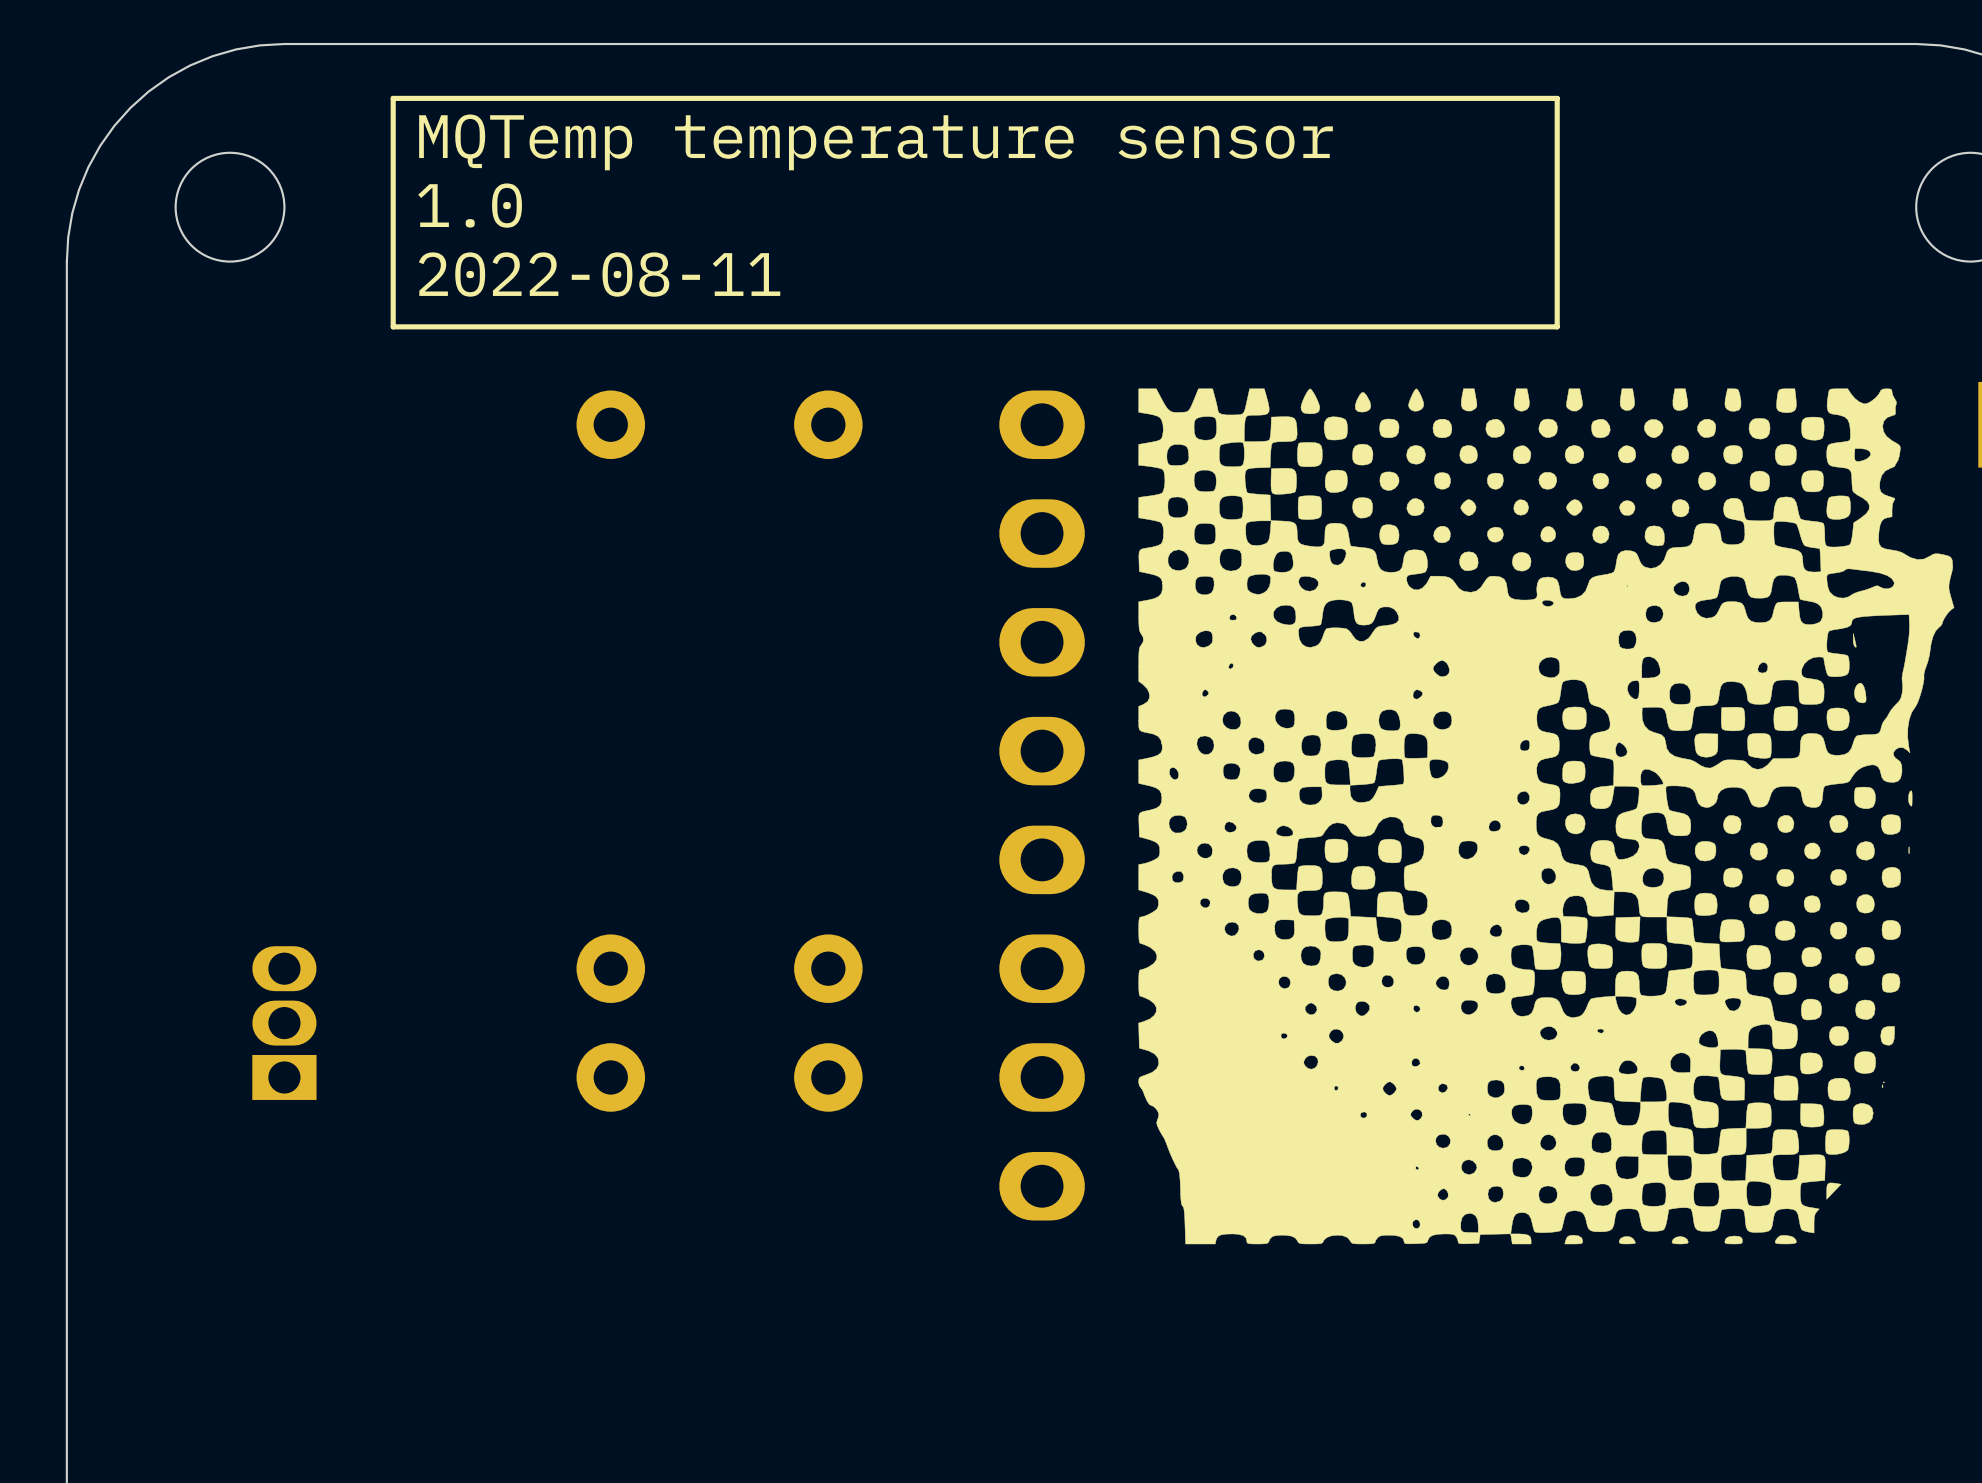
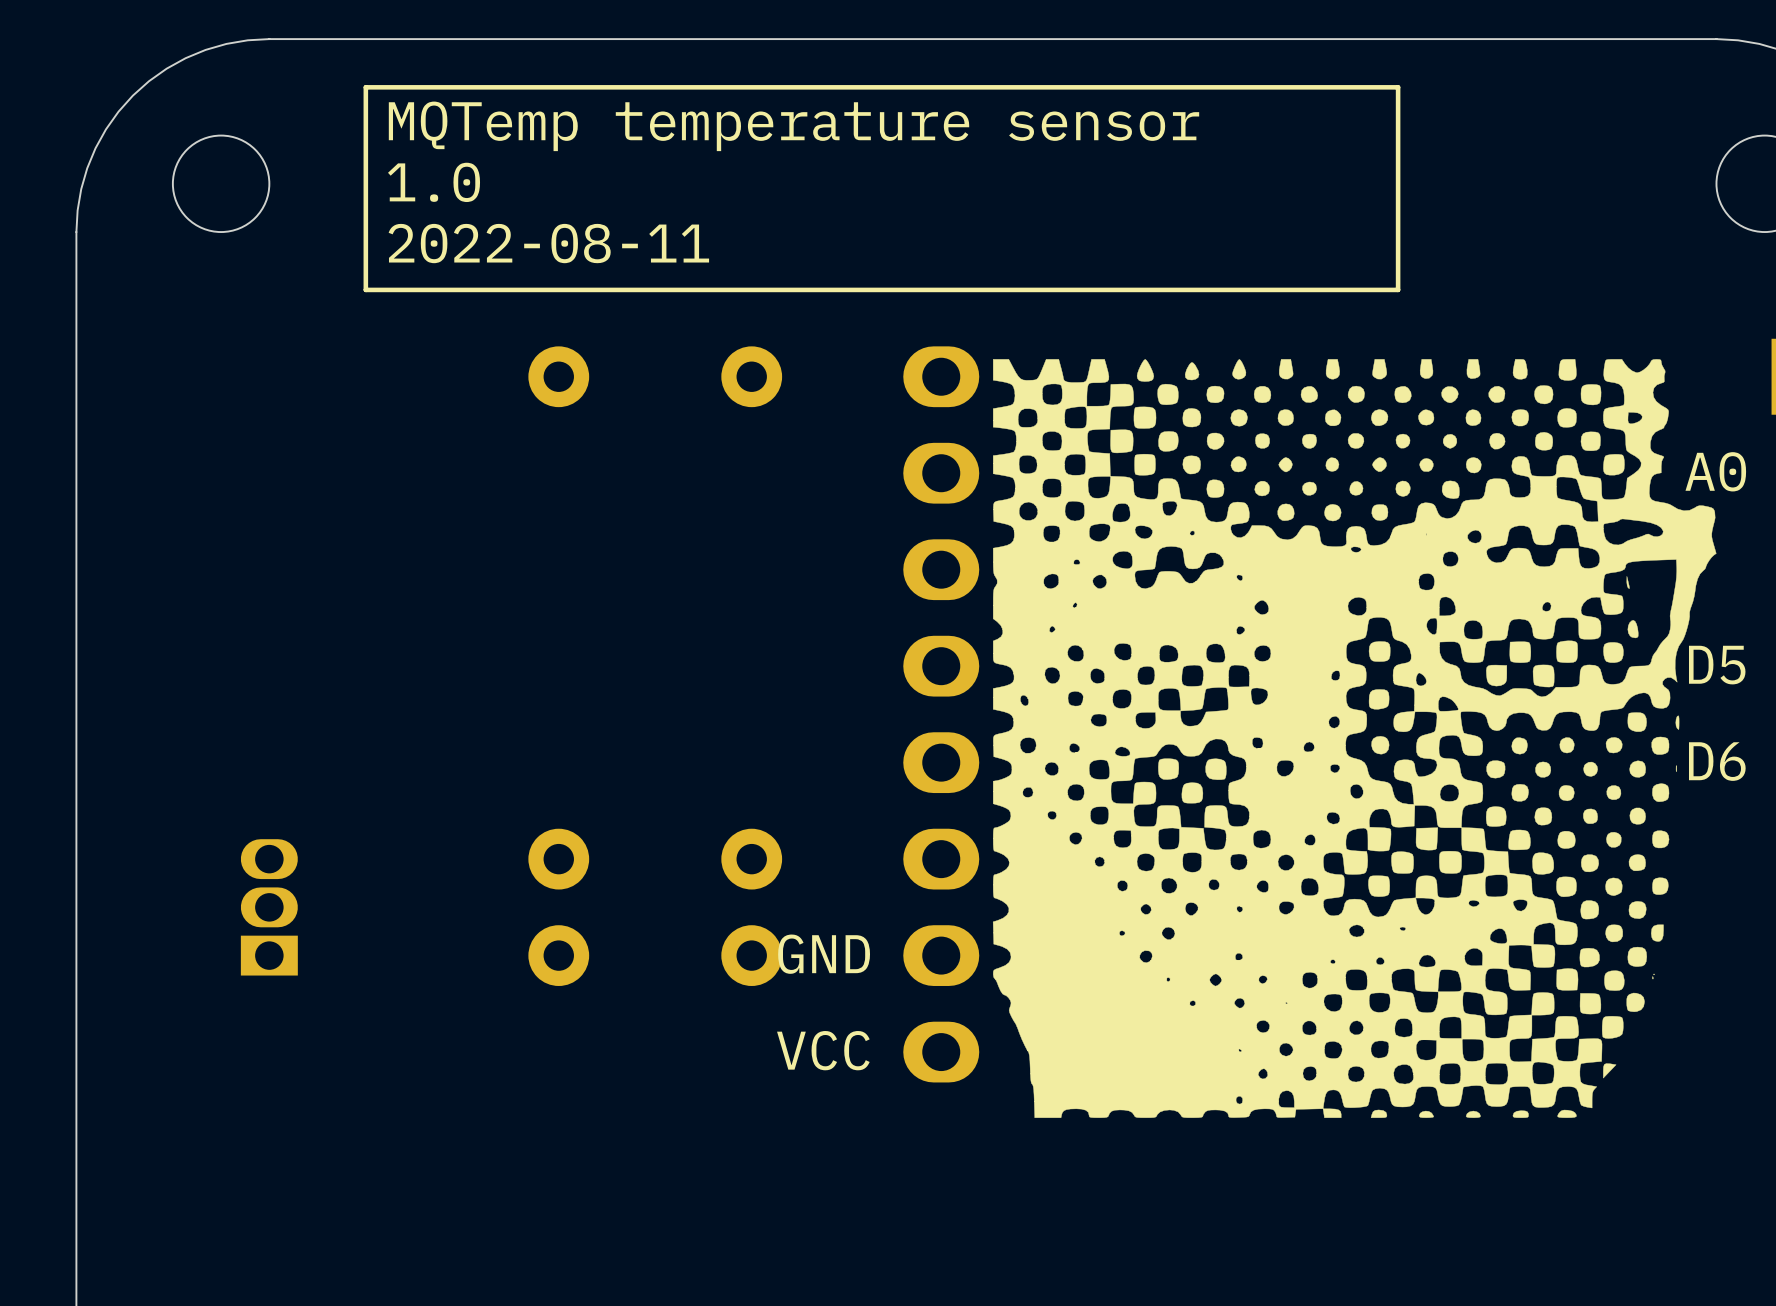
text: none -> A0 (1715, 471)
text: none -> D5 (1717, 665)
drawing position: (1546, 816) -> (1354, 738)
text: none -> D6 (1717, 761)
text: none -> GND (824, 954)
text: none -> VCC (823, 1050)

